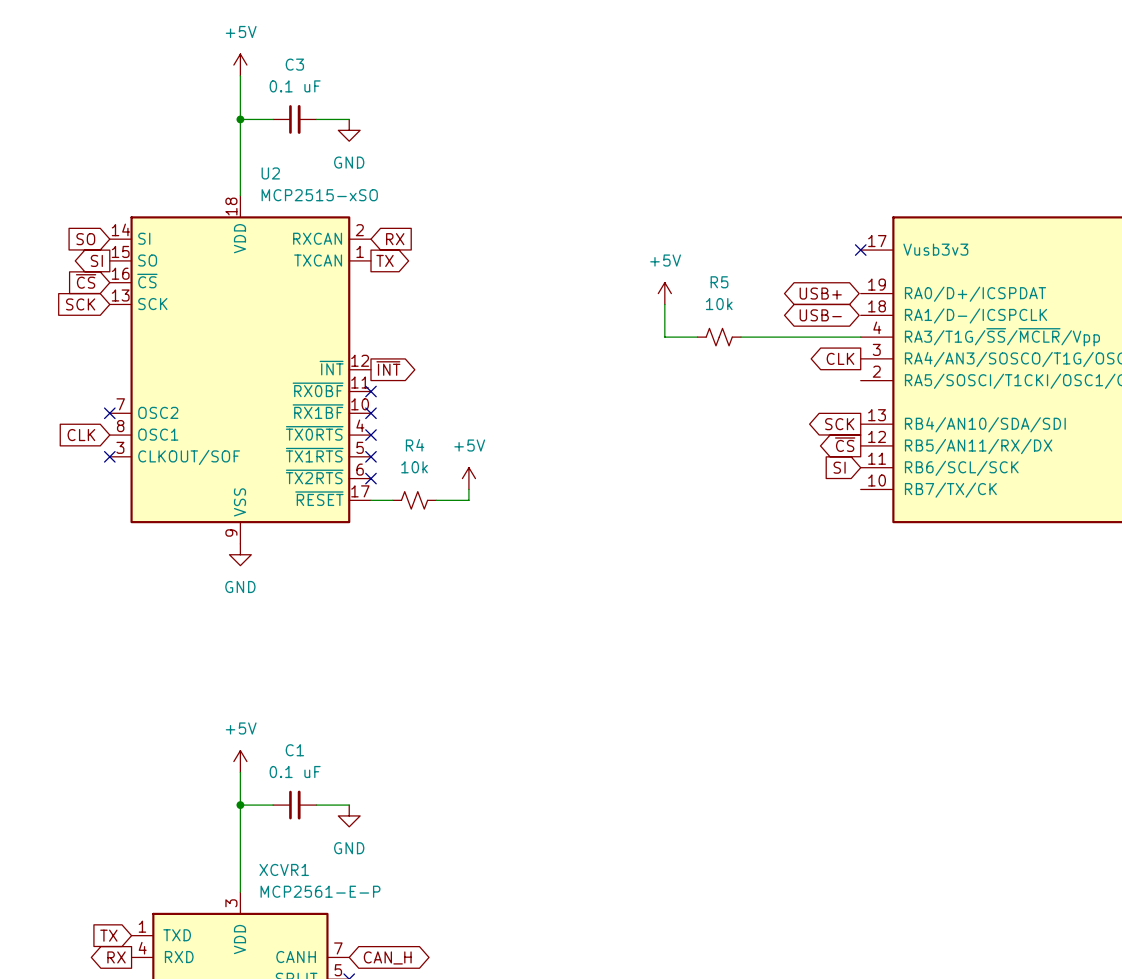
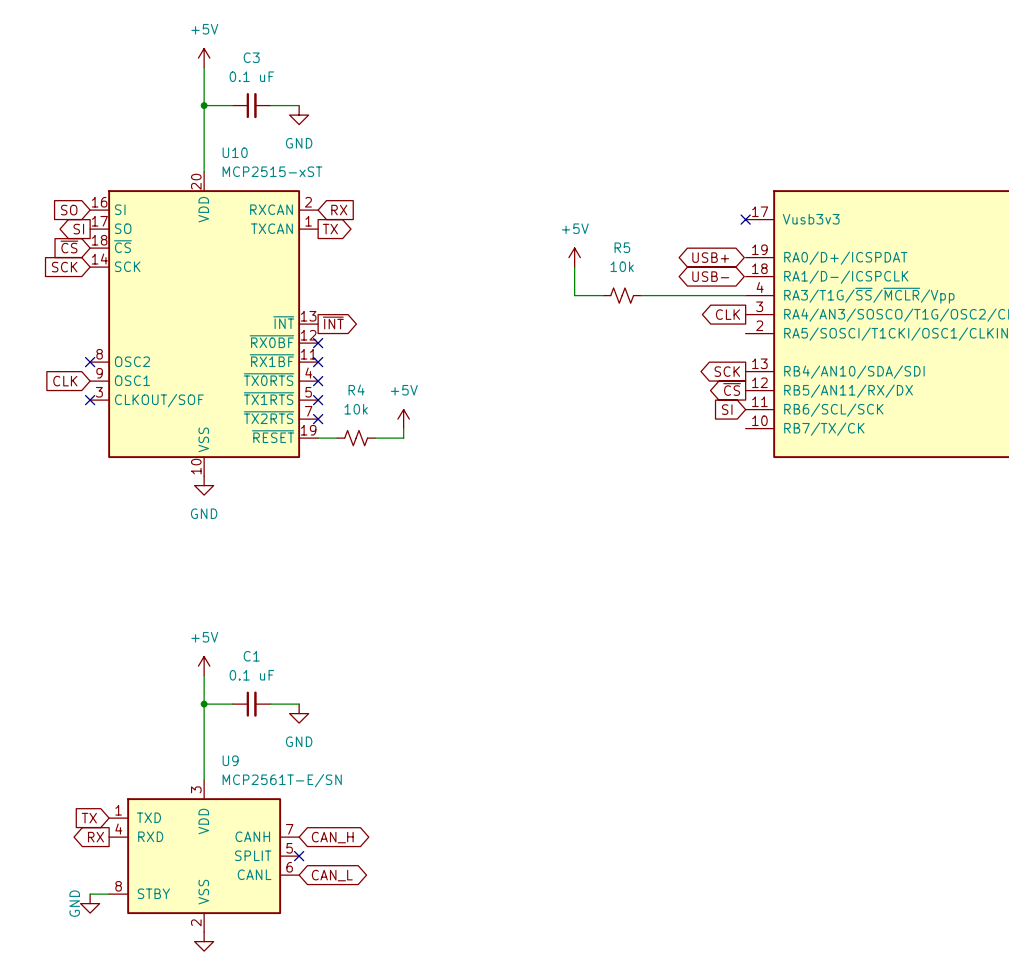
U2 name: U2 (270, 173) -> U10 (235, 152)
U2 symbol: [109, 195, 371, 544] -> [90, 172, 319, 477]
U2 value: MCP2515-xSO (319, 195) -> MCP2515-xST (272, 171)
XCVR1 name: XCVR1 (284, 869) -> U9 (230, 760)
XCVR1 value: MCP2561-E-P (320, 891) -> MCP2561T-E/SN (282, 780)

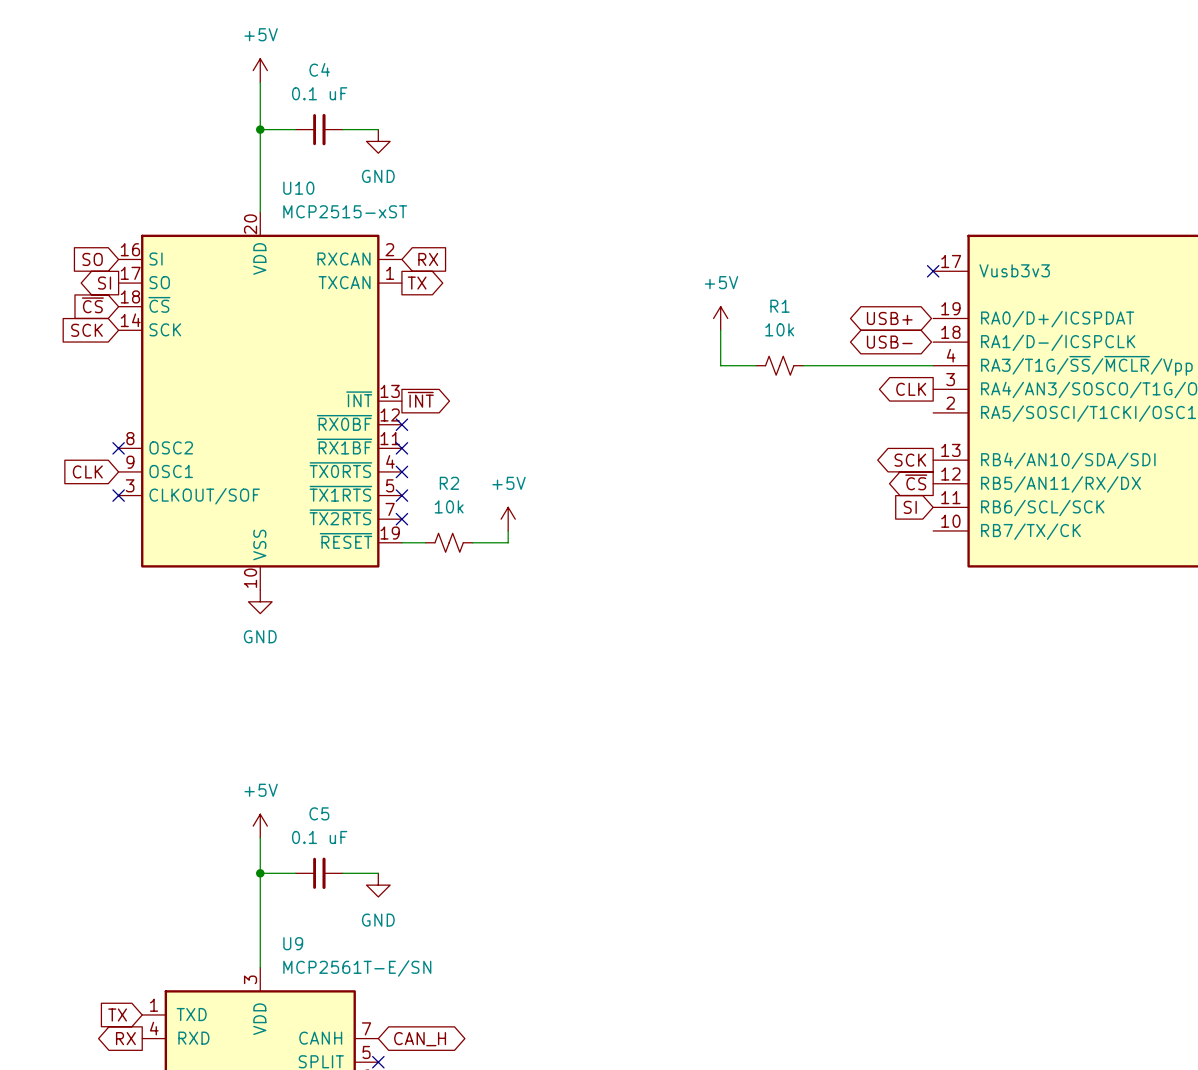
C3 name: C3 (251, 57) -> C4 (319, 69)
R5 name: R5 (622, 247) -> R1 (779, 306)
R4 name: R4 (356, 390) -> R2 (449, 483)
C1 name: C1 (251, 656) -> C5 (319, 813)

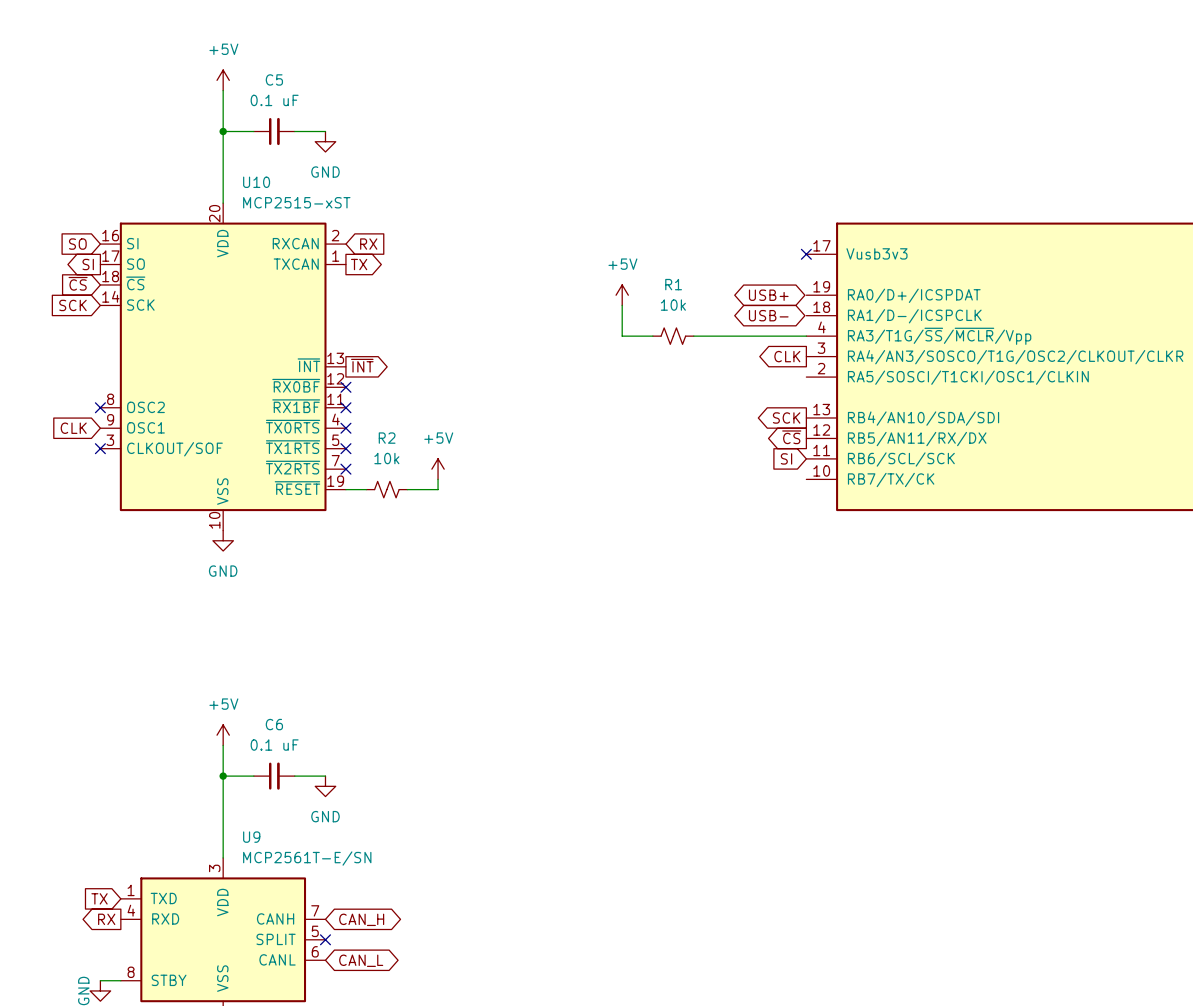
C4 name: C4 (319, 69) -> C5 (274, 79)
C5 name: C5 (319, 813) -> C6 (274, 724)

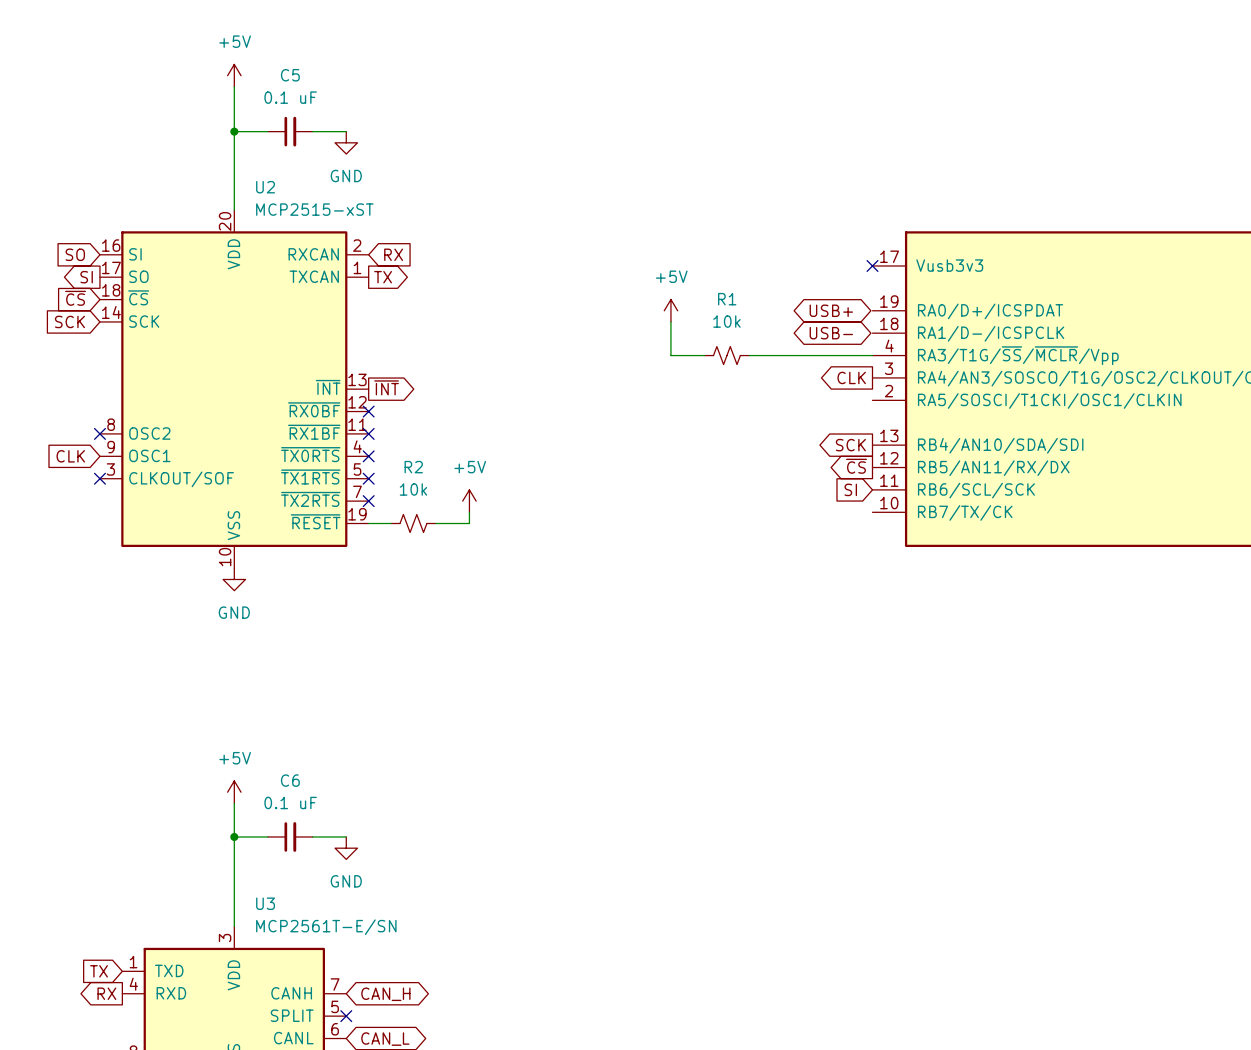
U10 name: U10 (256, 182) -> U2 (265, 187)
U9 name: U9 (251, 837) -> U3 (265, 903)

